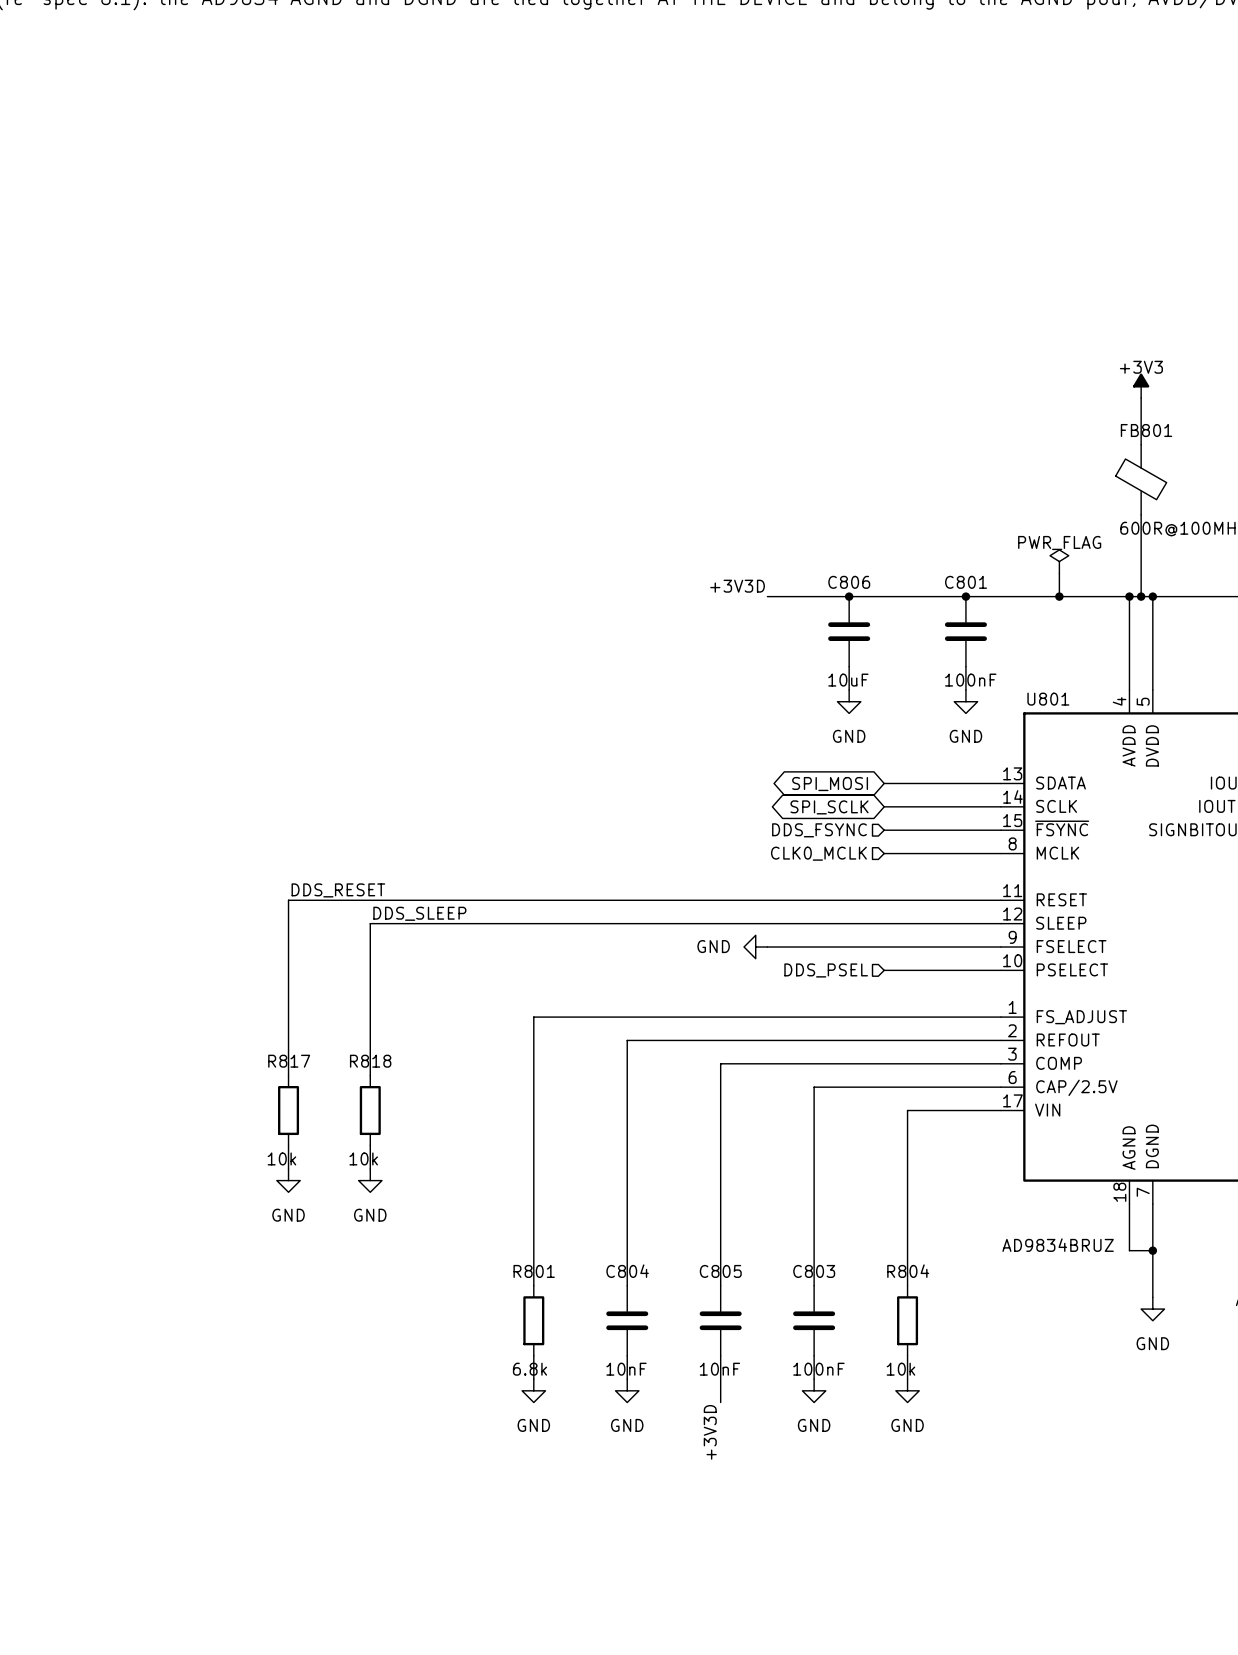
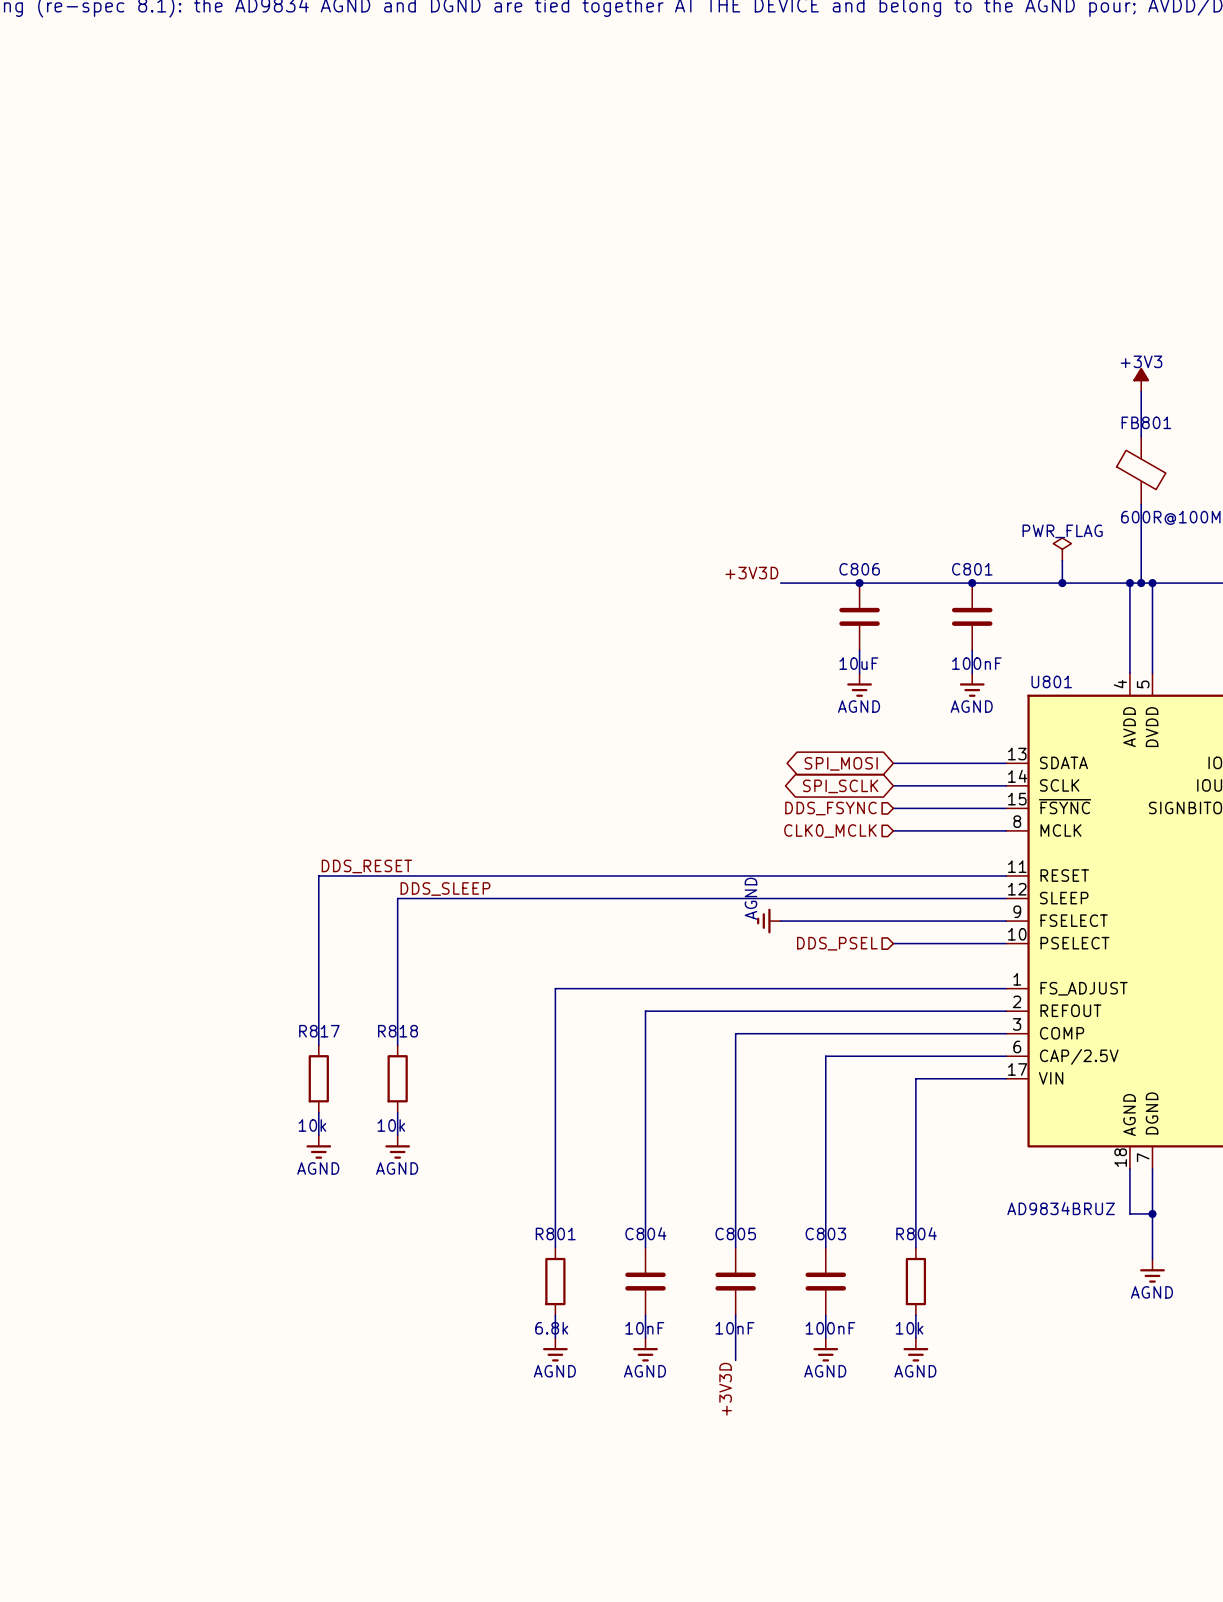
power symbol: GND (849, 701) -> AGND (859, 685)
power symbol: GND (965, 701) -> AGND (972, 685)
power symbol: GND (755, 947) -> AGND (768, 921)
power symbol: GND (288, 1180) -> AGND (318, 1146)
power symbol: GND (370, 1180) -> AGND (397, 1146)
power symbol: GND (1152, 1309) -> AGND (1152, 1270)
power symbol: GND (533, 1390) -> AGND (555, 1349)
power symbol: GND (627, 1390) -> AGND (645, 1349)
power symbol: GND (814, 1390) -> AGND (825, 1349)
power symbol: GND (907, 1390) -> AGND (915, 1349)

